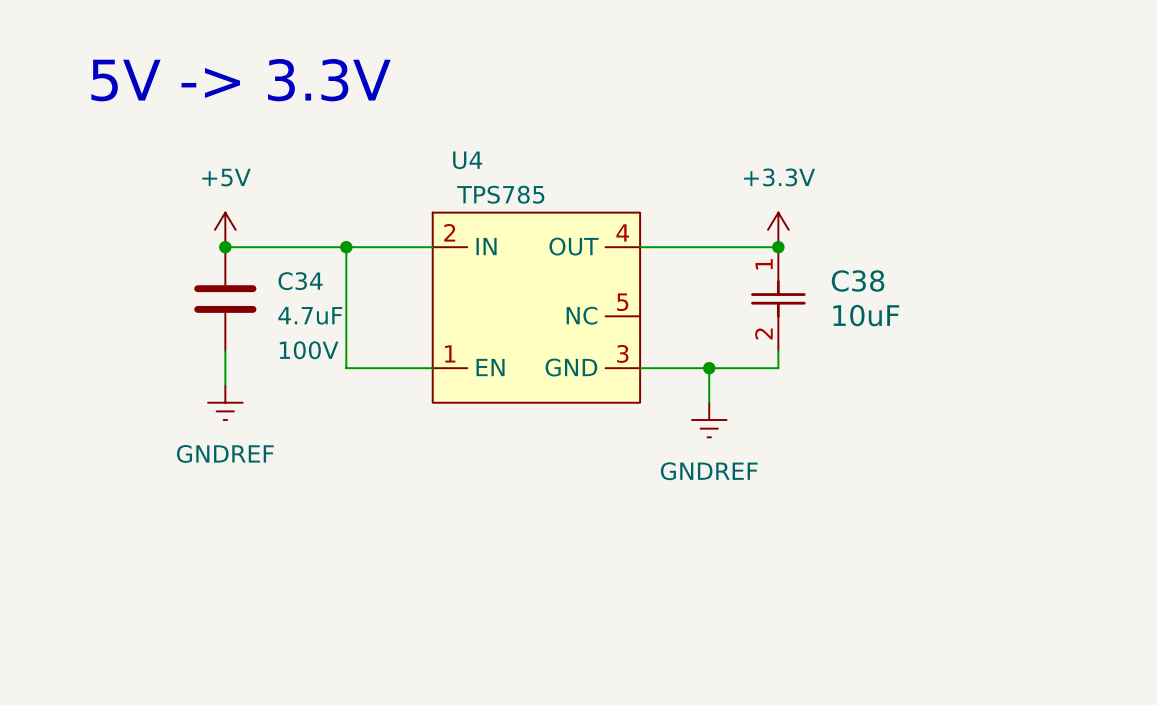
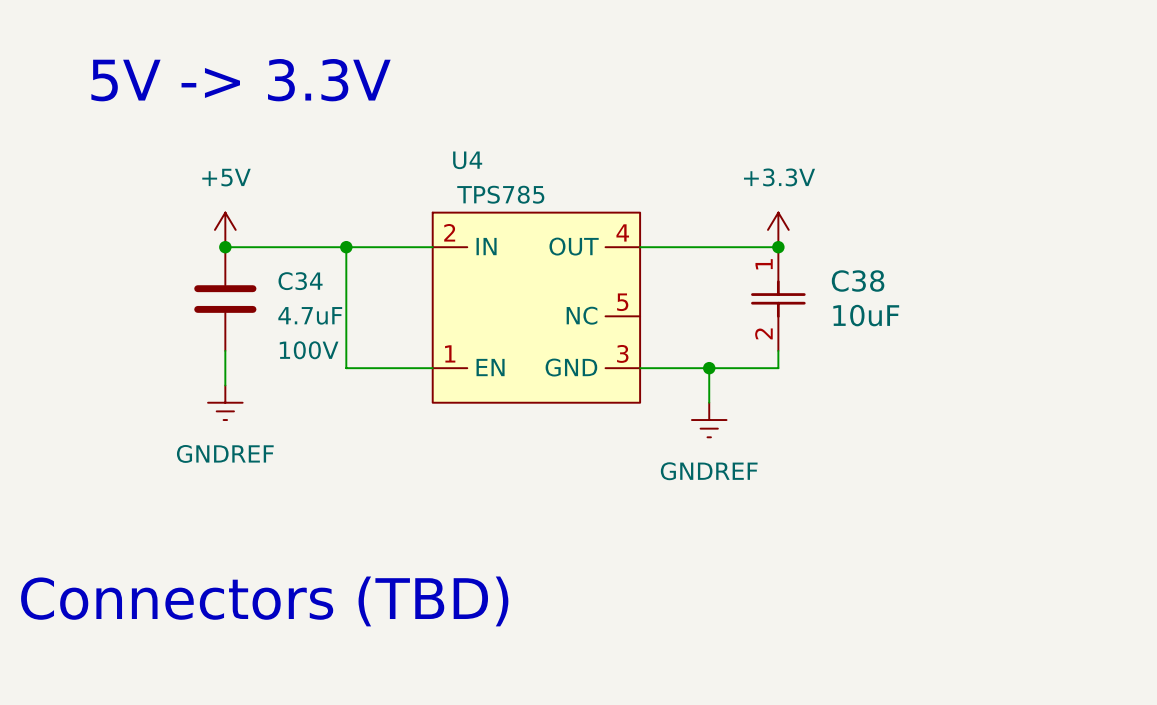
text: none -> Connectors (TBD) (264, 601)

